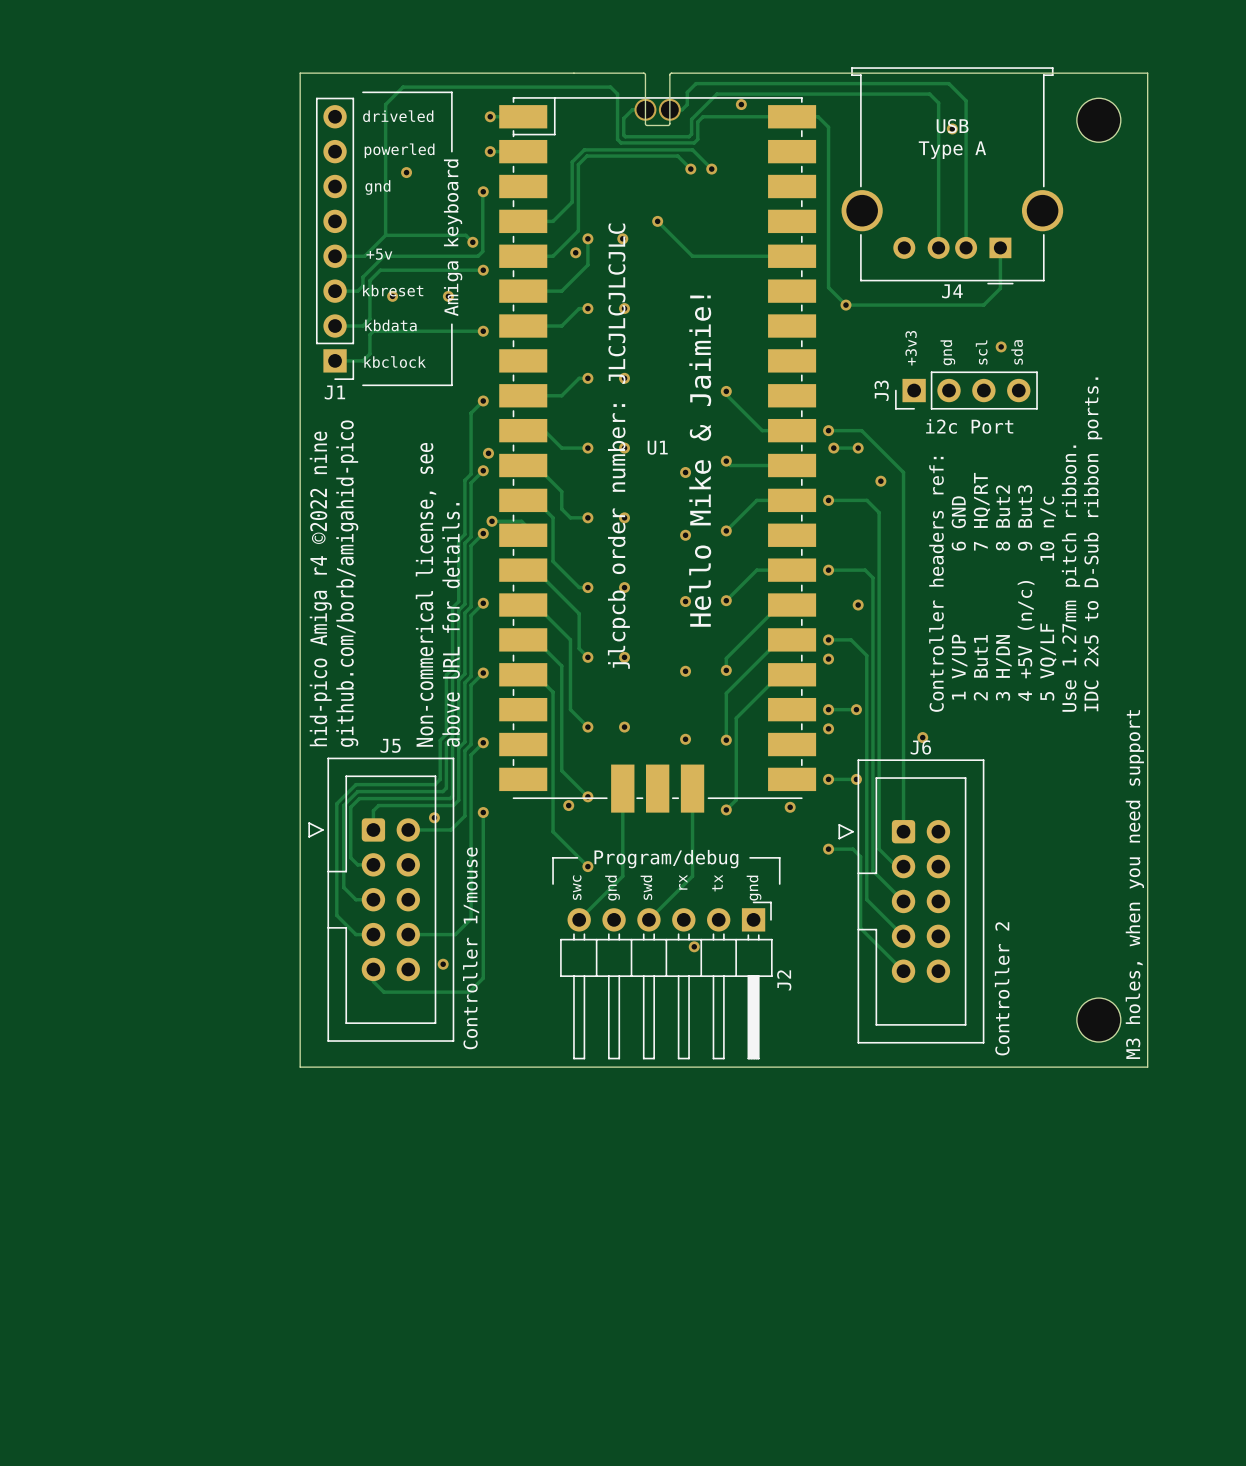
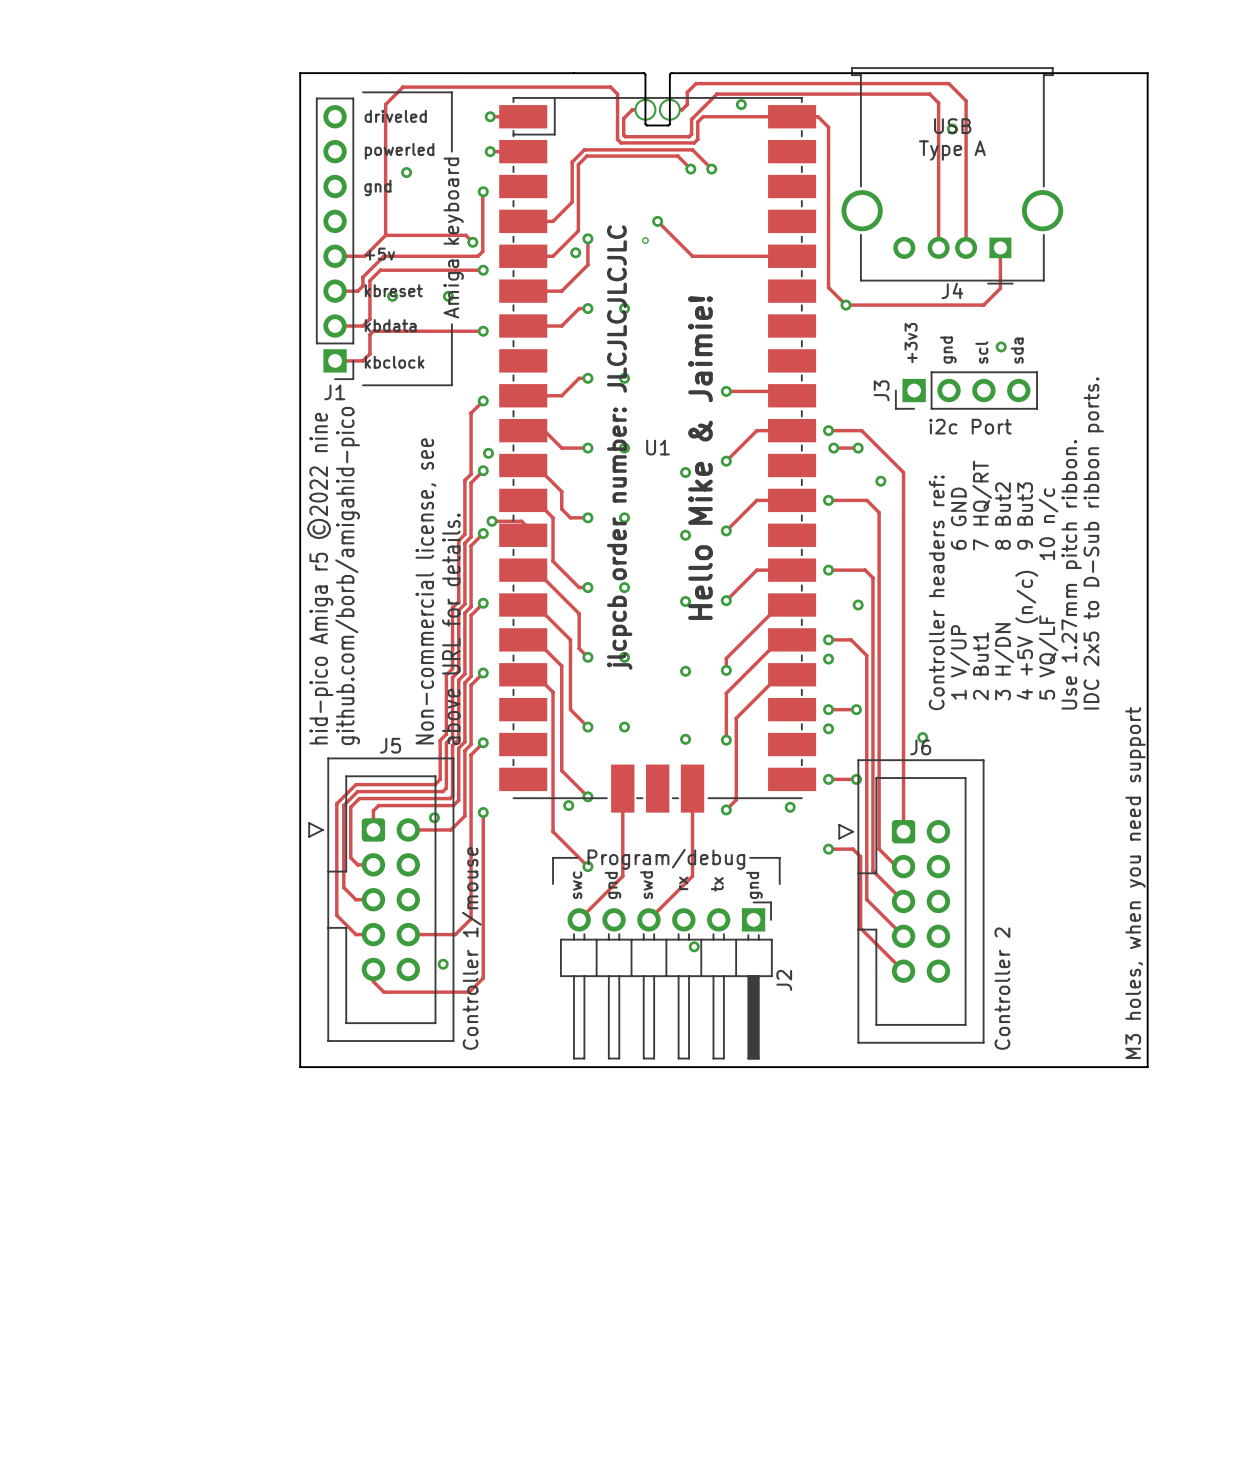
part: (1098, 120) -> none
via: (622, 238) -> none
via: none -> (645, 240)
track: none -> (726, 391) (775, 391) (779, 395)
track: (726, 394) (762, 430) -> none
track: (726, 461) (730, 465) (779, 465) -> (726, 461) (756, 430) (762, 430)
text: hid-pico Amiga r4 ©️2022 nine (320, 588) -> hid-pico Amiga r5 ©️2022 nine (320, 578)
text: Non-commerical license, see (425, 594) -> Non-commercial license, see (425, 591)
part: (1098, 1020) -> none

